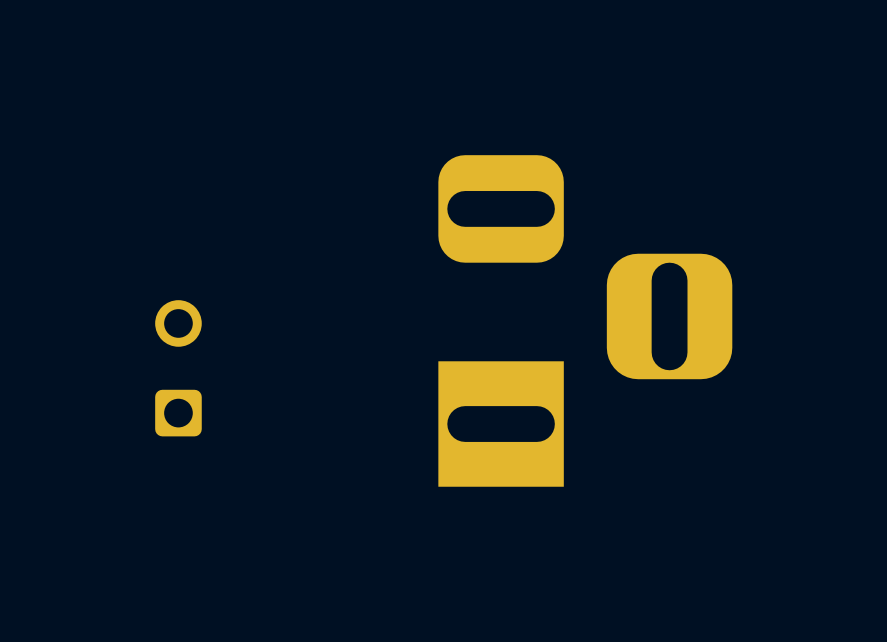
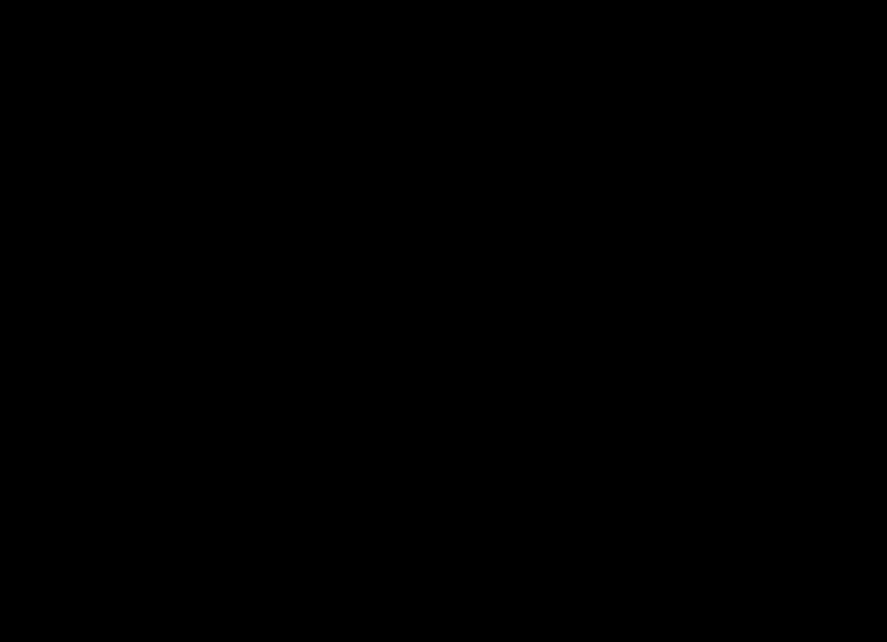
part: (585, 320) -> none
part: (178, 368) -> none

